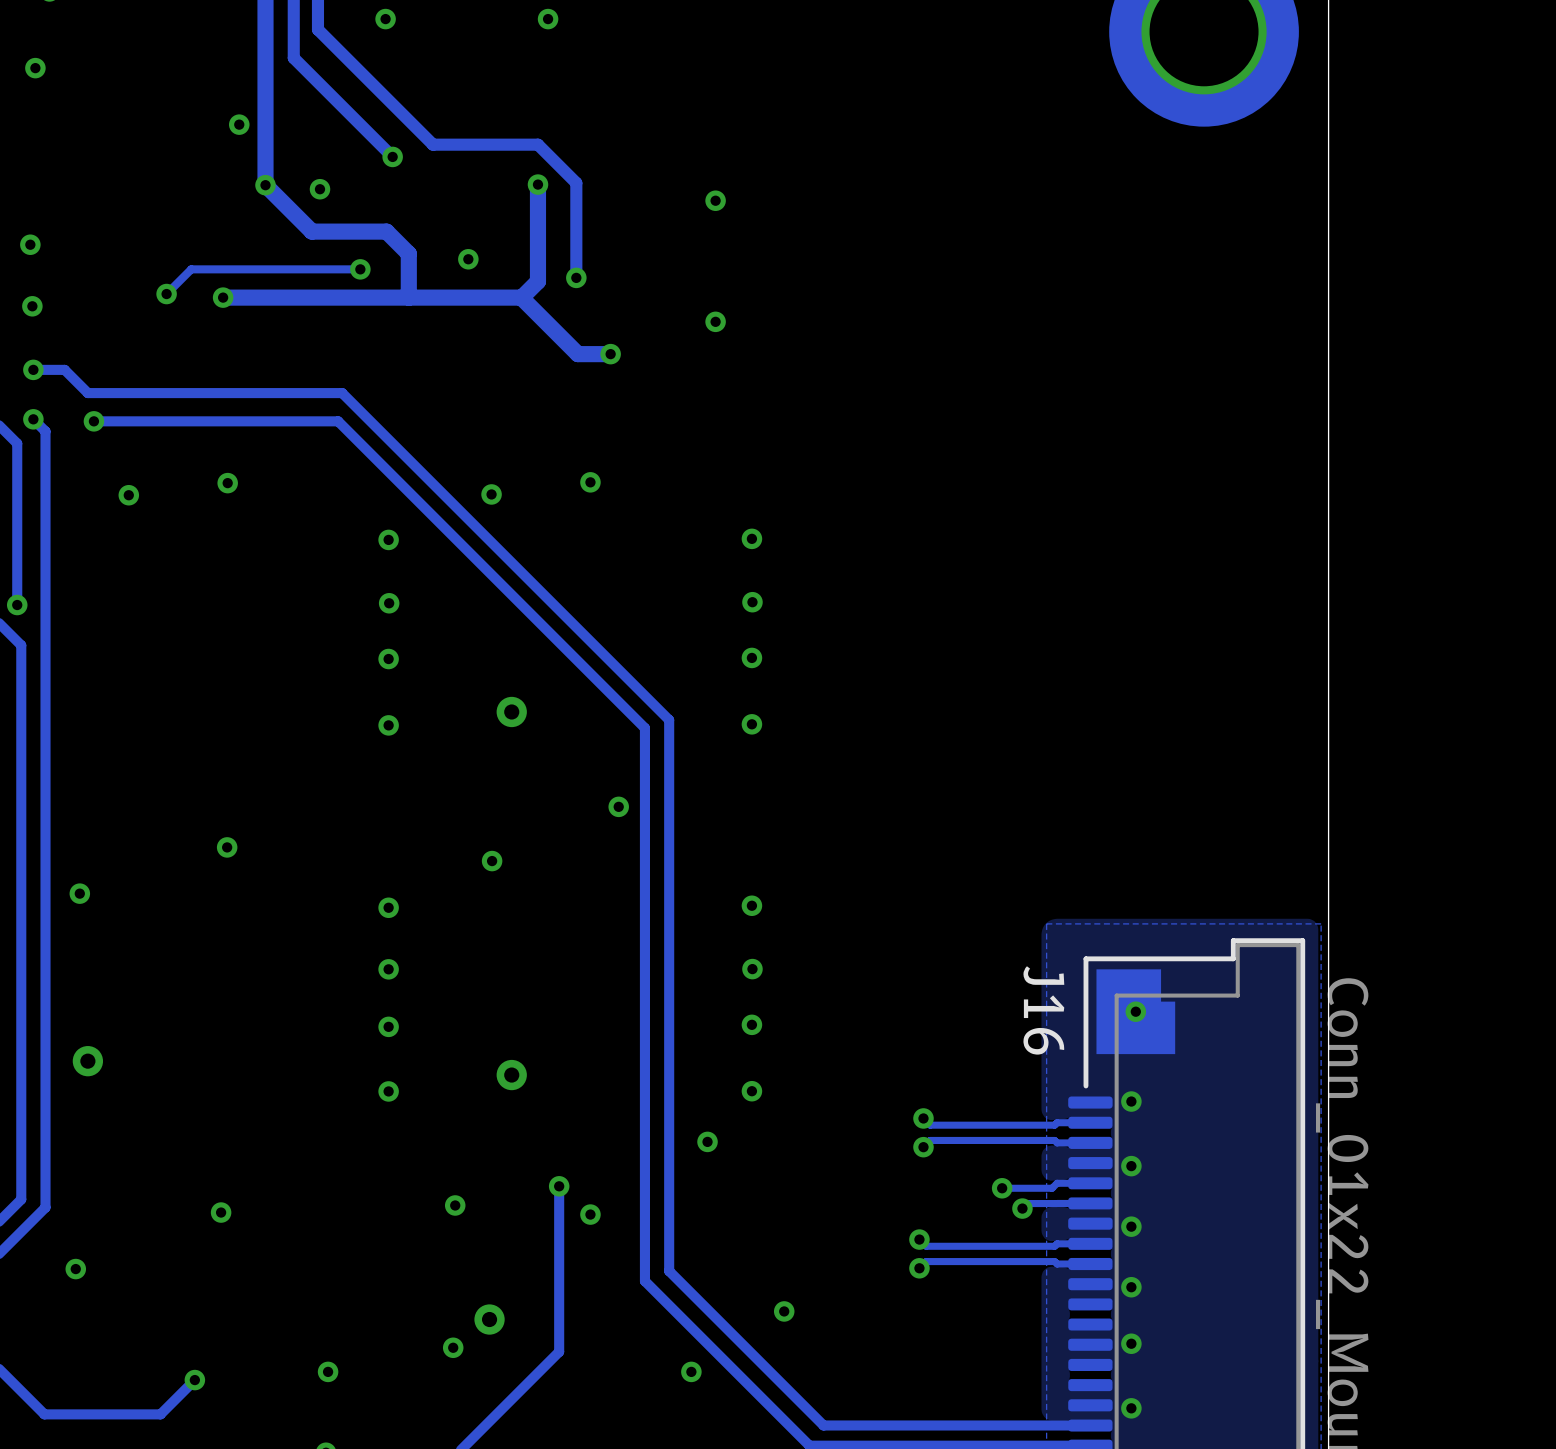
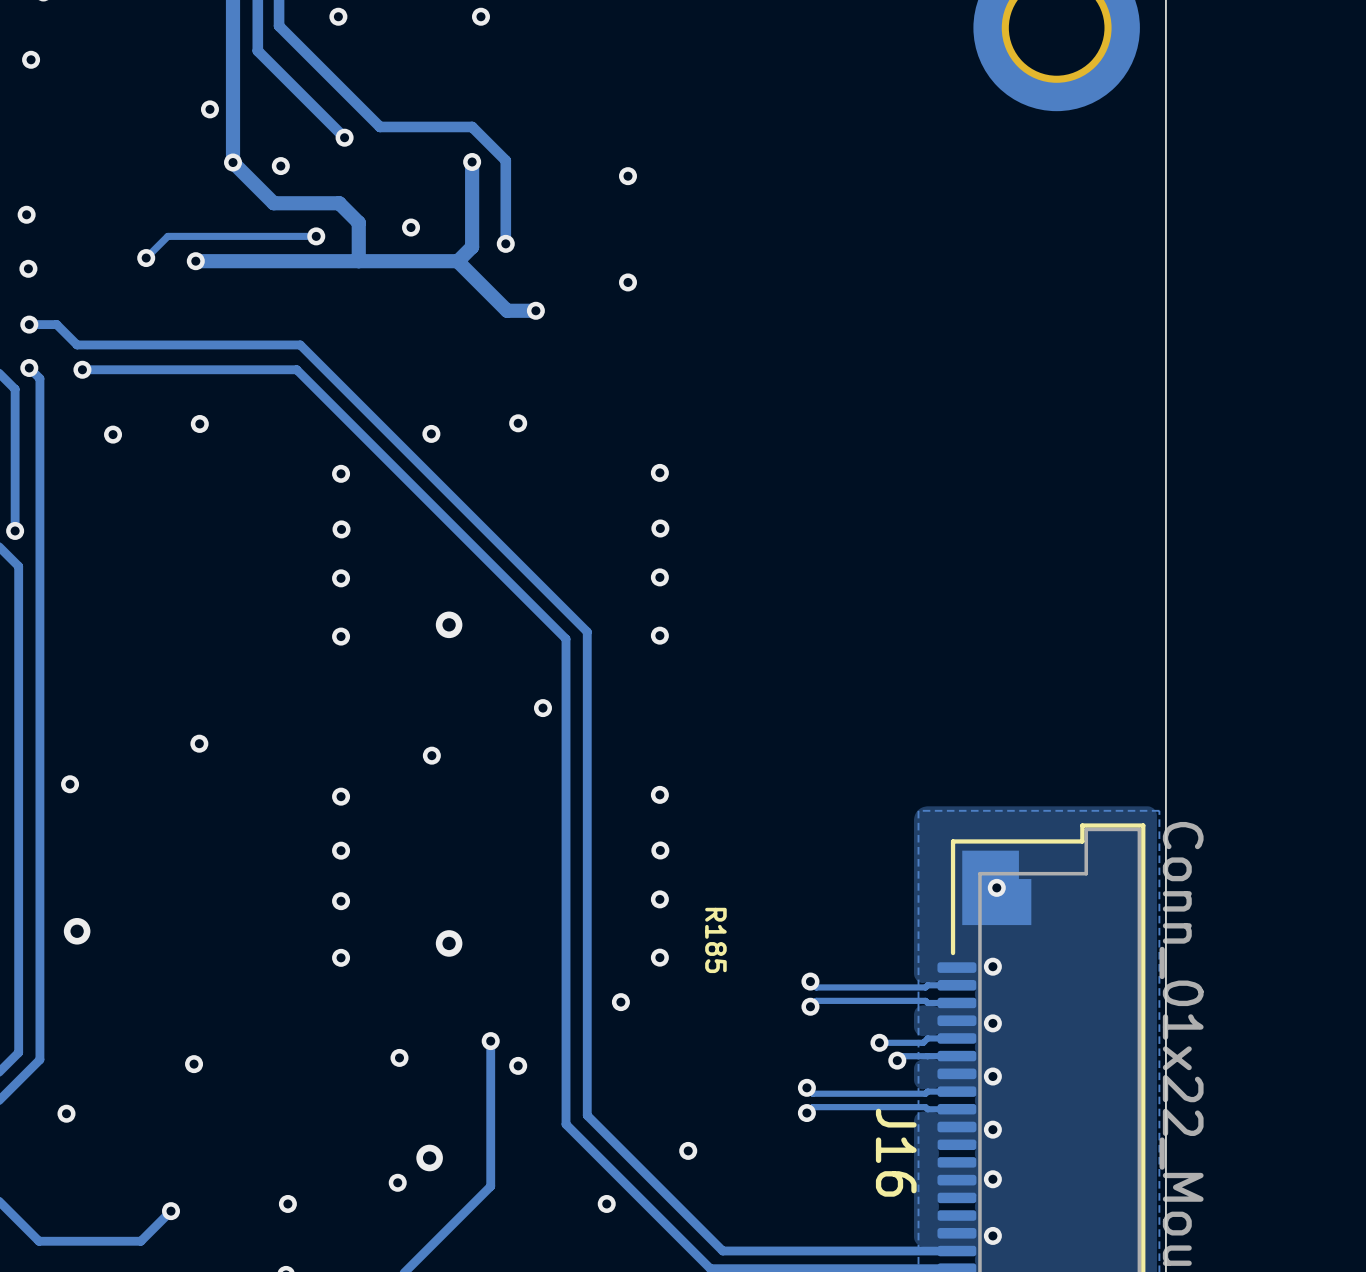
J16 name position: J16 (1043, 1010) -> J16 (896, 1152)
R185: none -> (715, 940)

